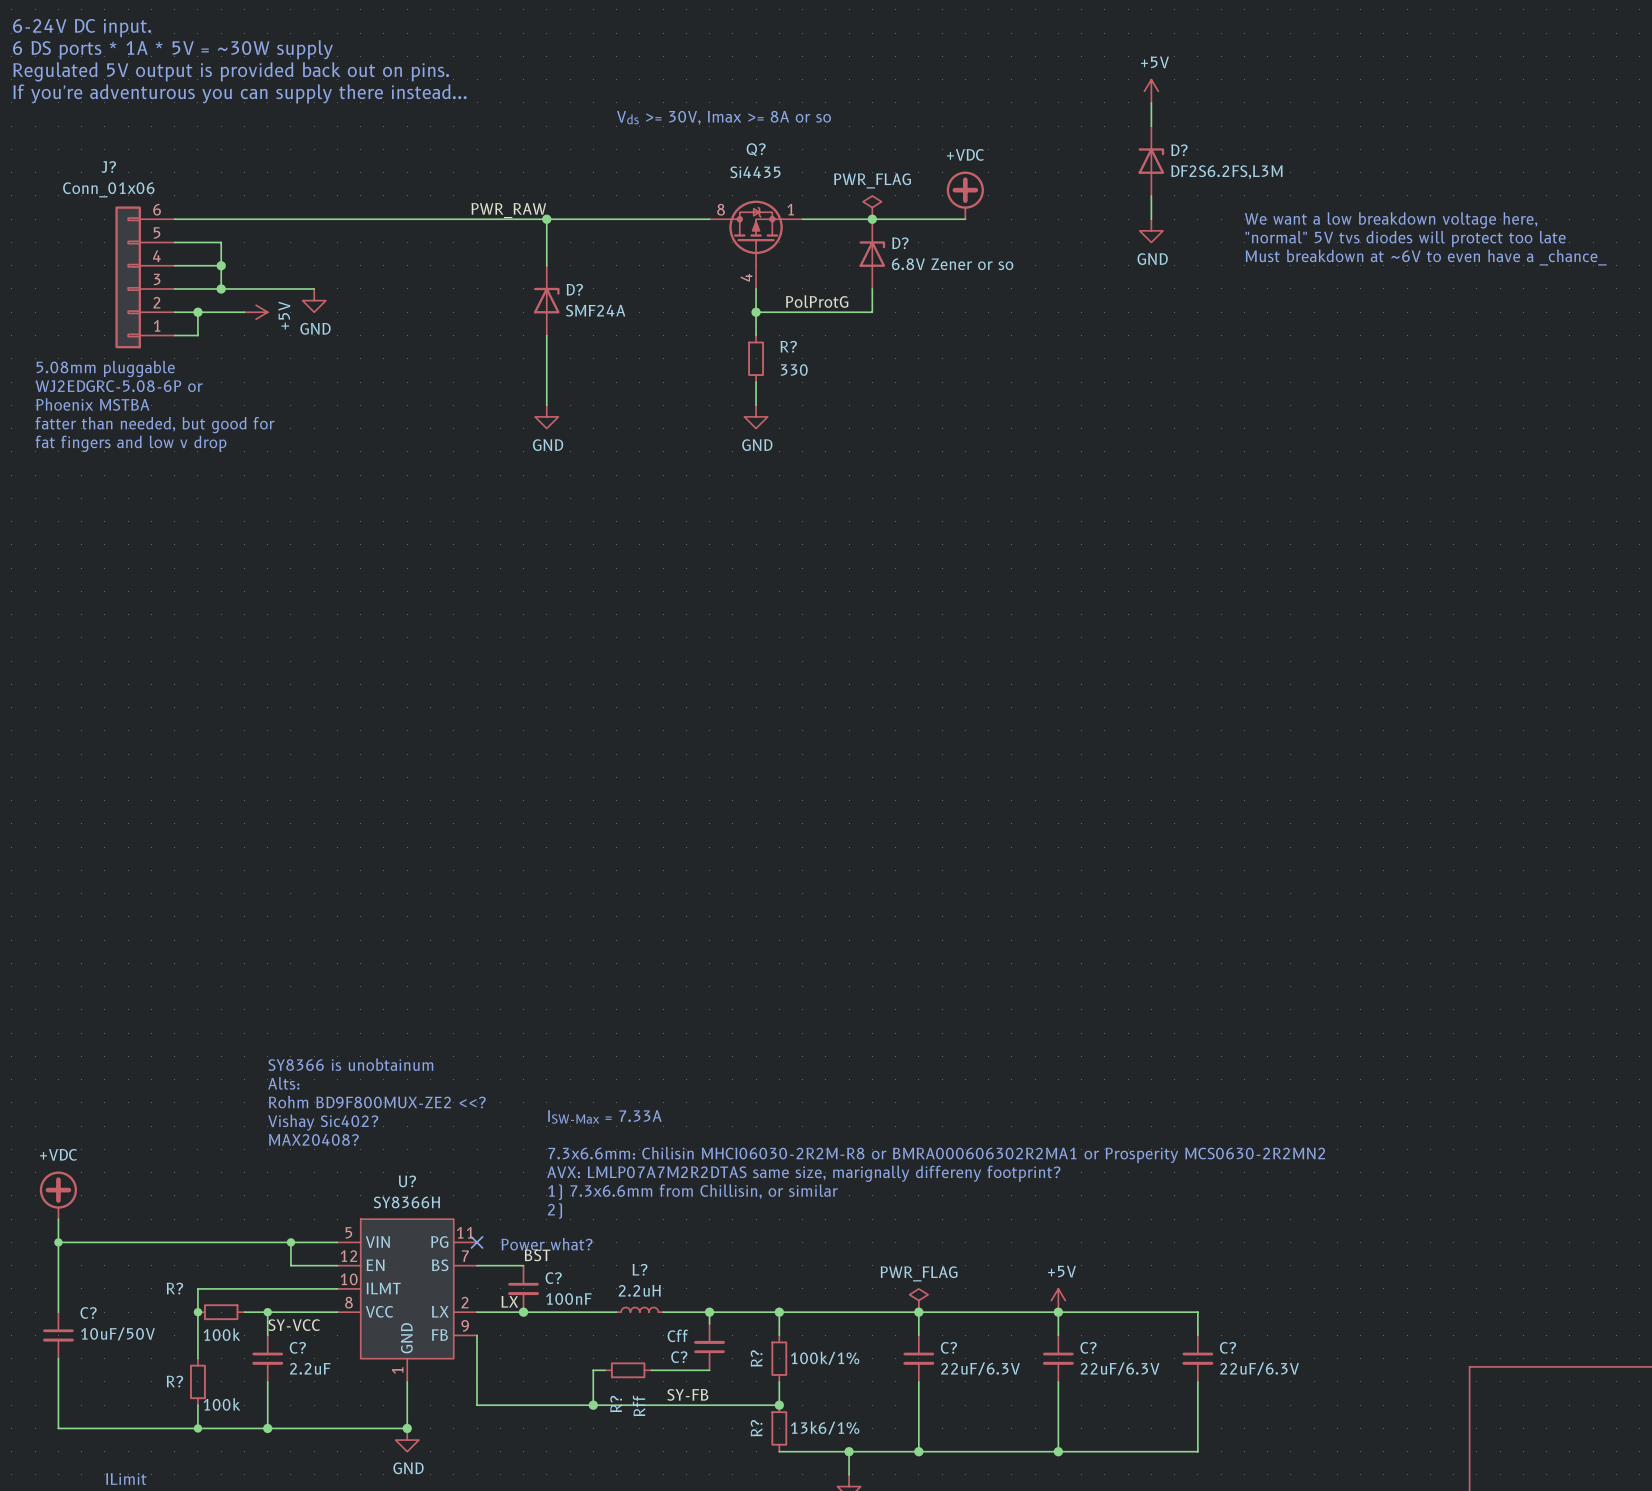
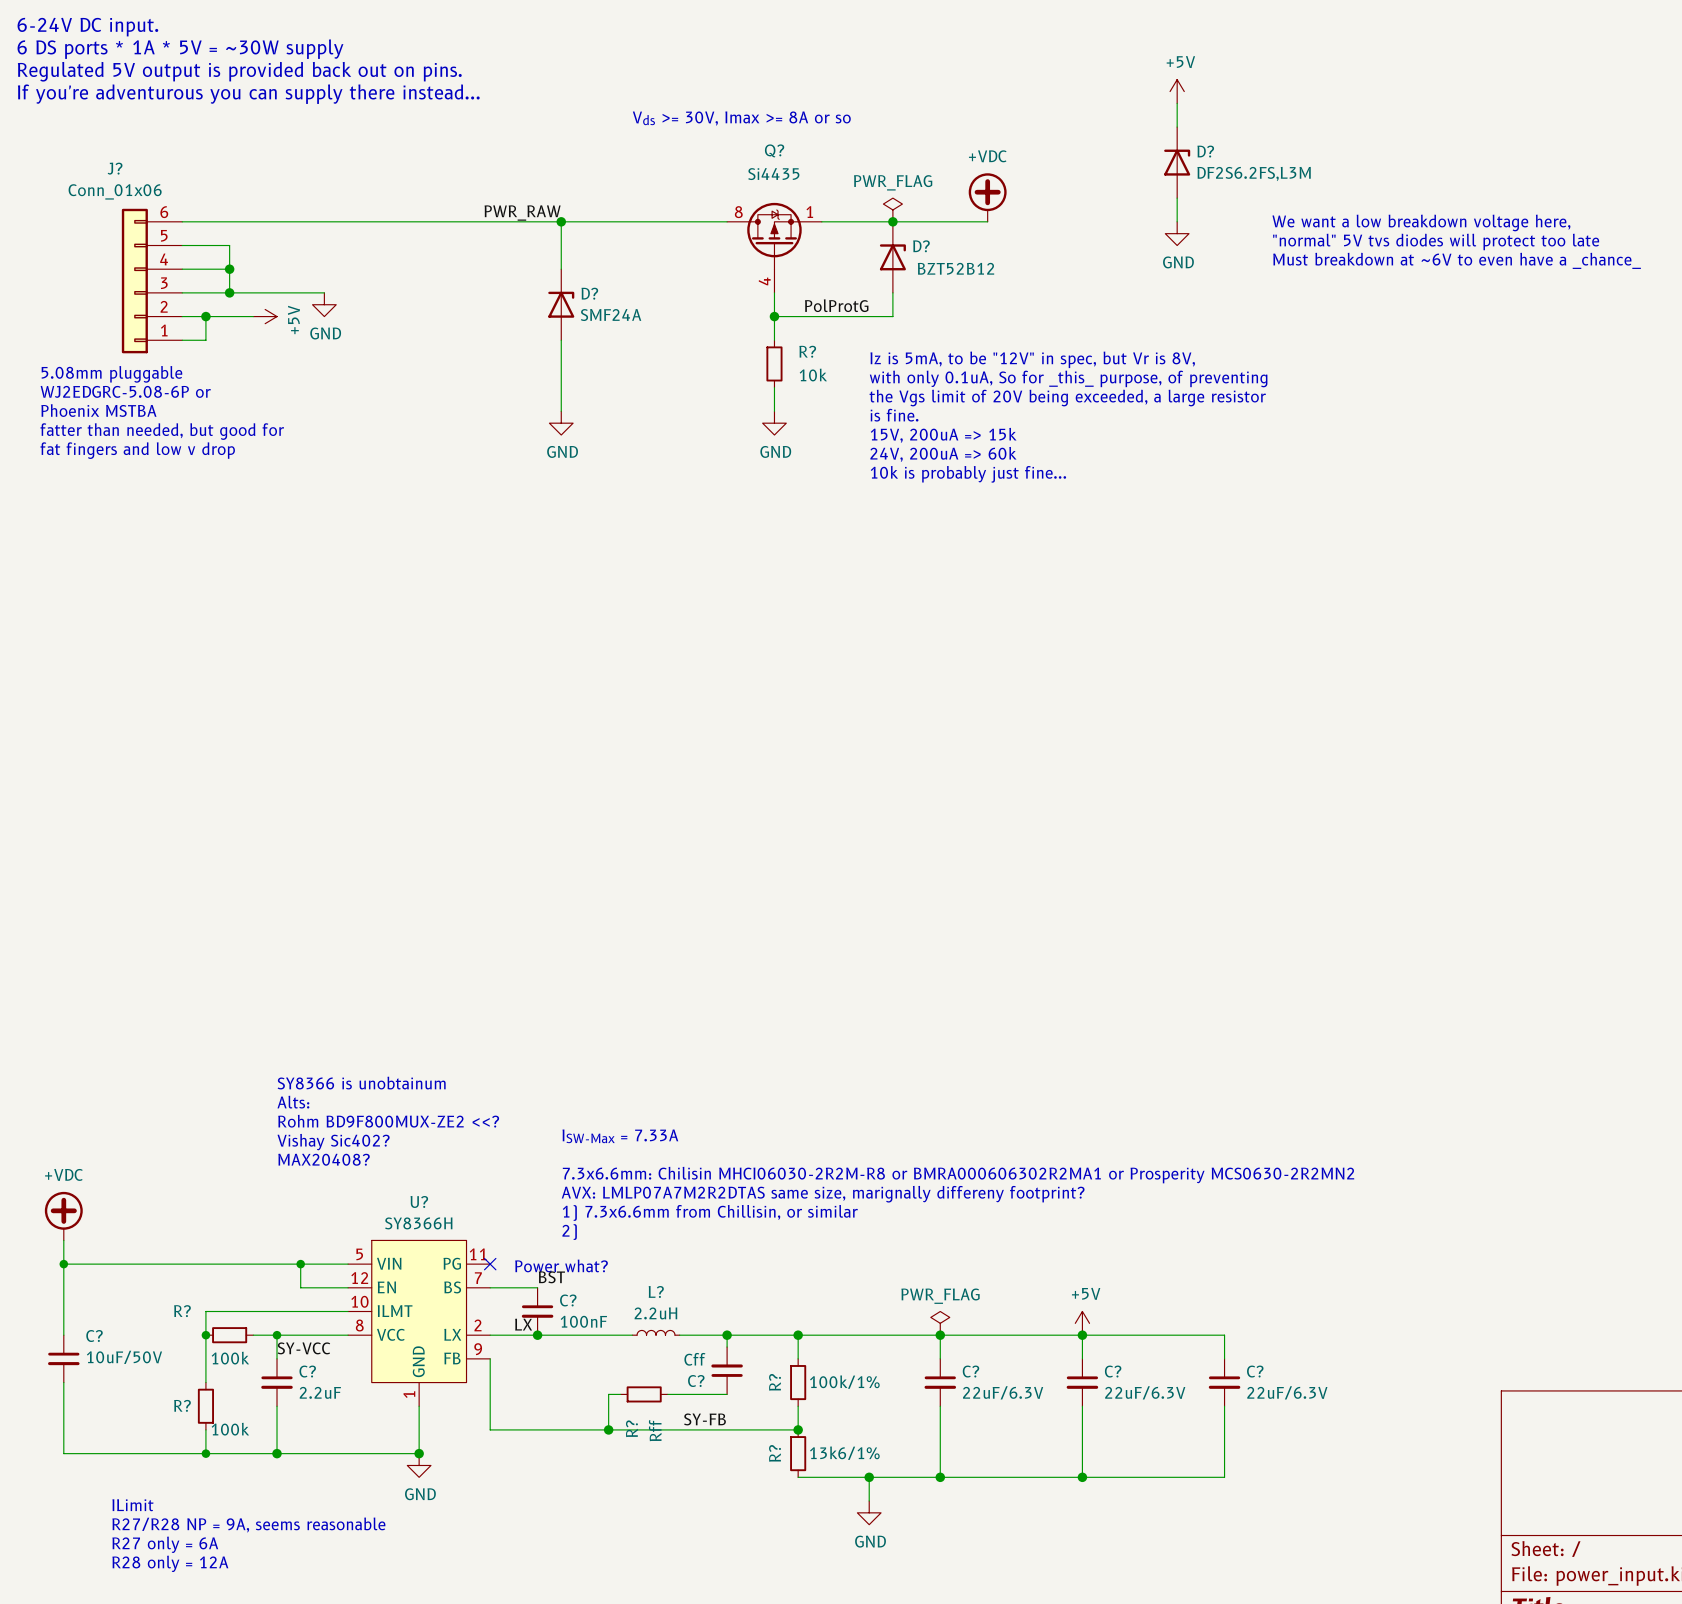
D? value: 6.8V Zener or so (952, 264) -> BZT52B12 (956, 268)
text: none -> Iz is 5mA, to be "12V" in spec, but Vr is 8V, (1032, 359)
R? value: 330 (794, 370) -> 10k (813, 375)
text: none -> with only 0.1uA, So for _this_ purpose, of preventing (1068, 378)
text: none -> the Vgs limit of 20V being exceeded, a large resistor (1067, 398)
text: none -> is fine. (894, 415)
text: none -> 15V, 200uA => 15k (943, 435)
text: none -> 24V, 200uA => 60k (943, 454)
text: none -> 10k is probably just fine... (968, 474)

